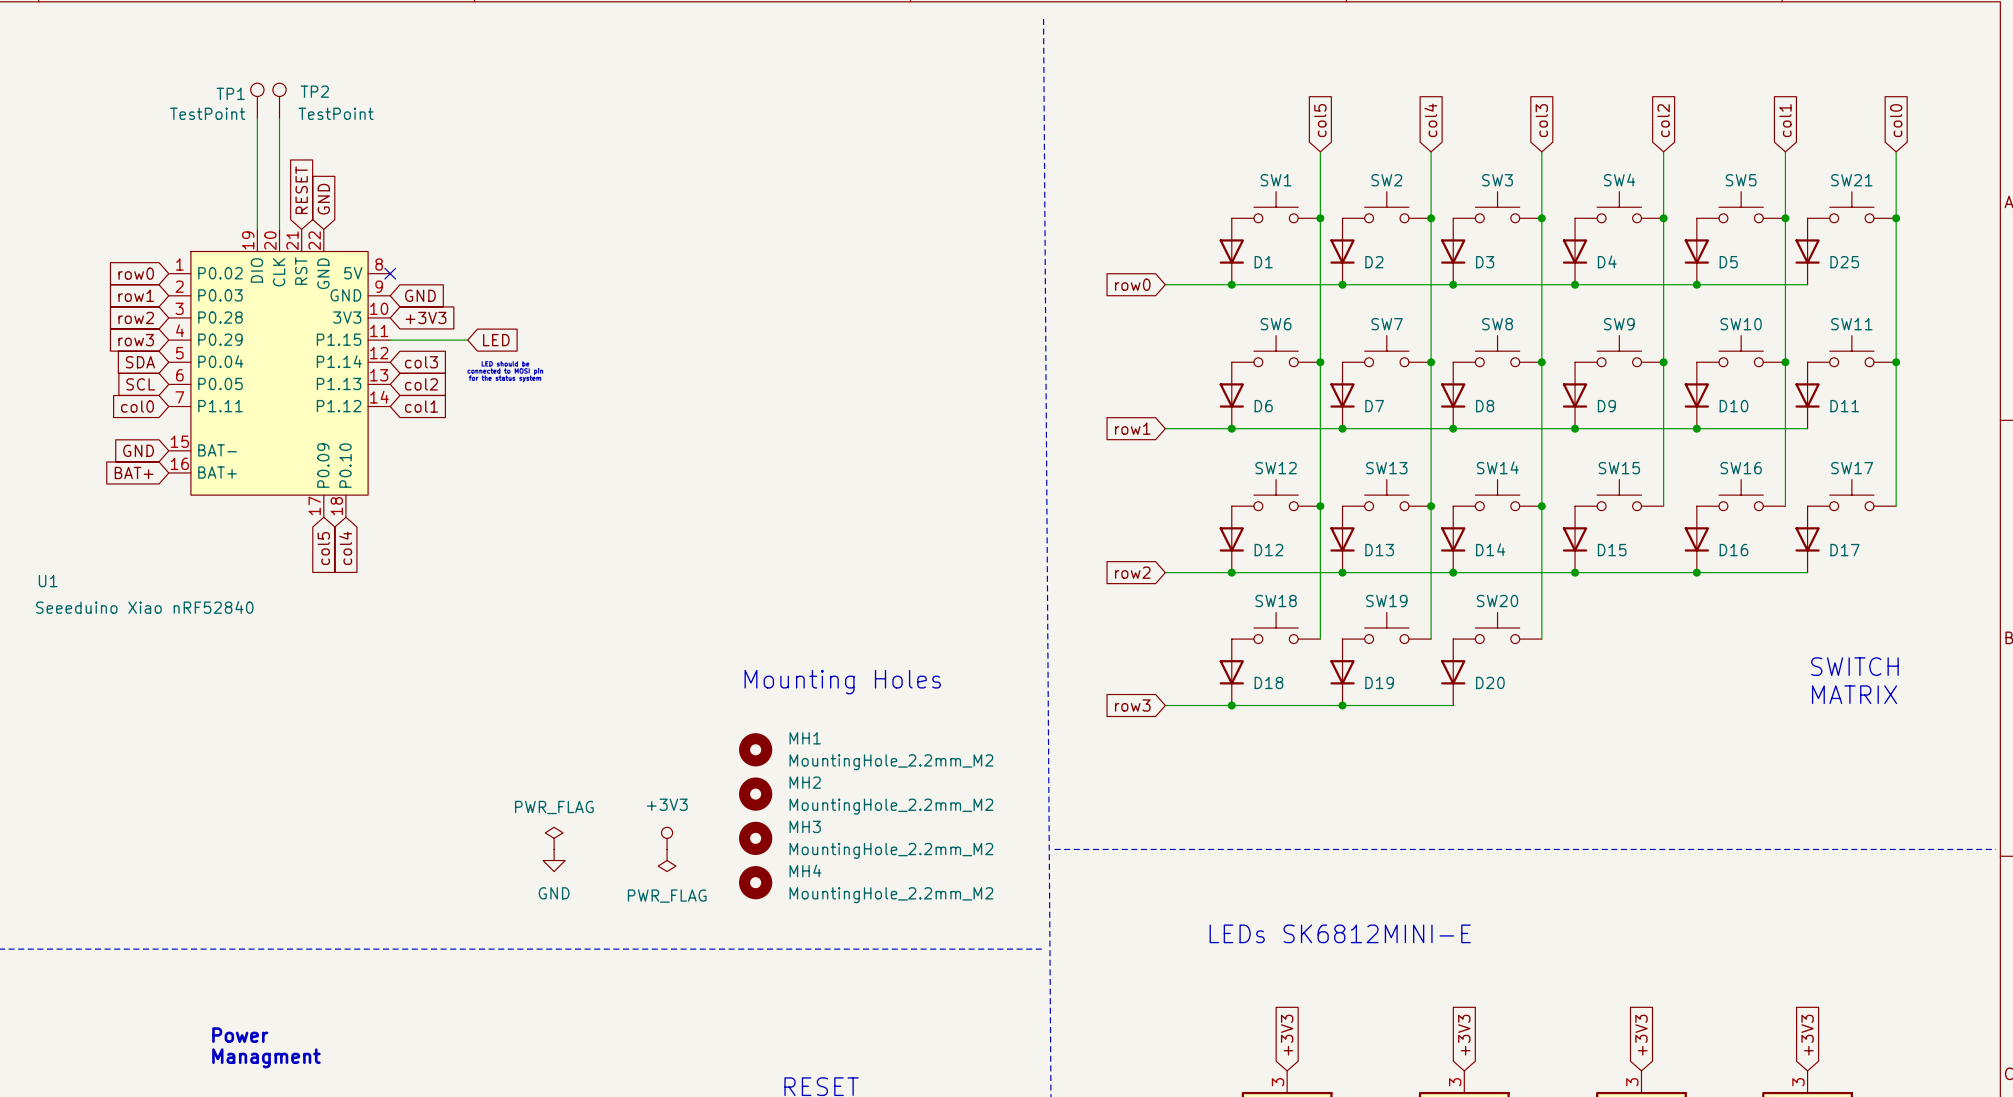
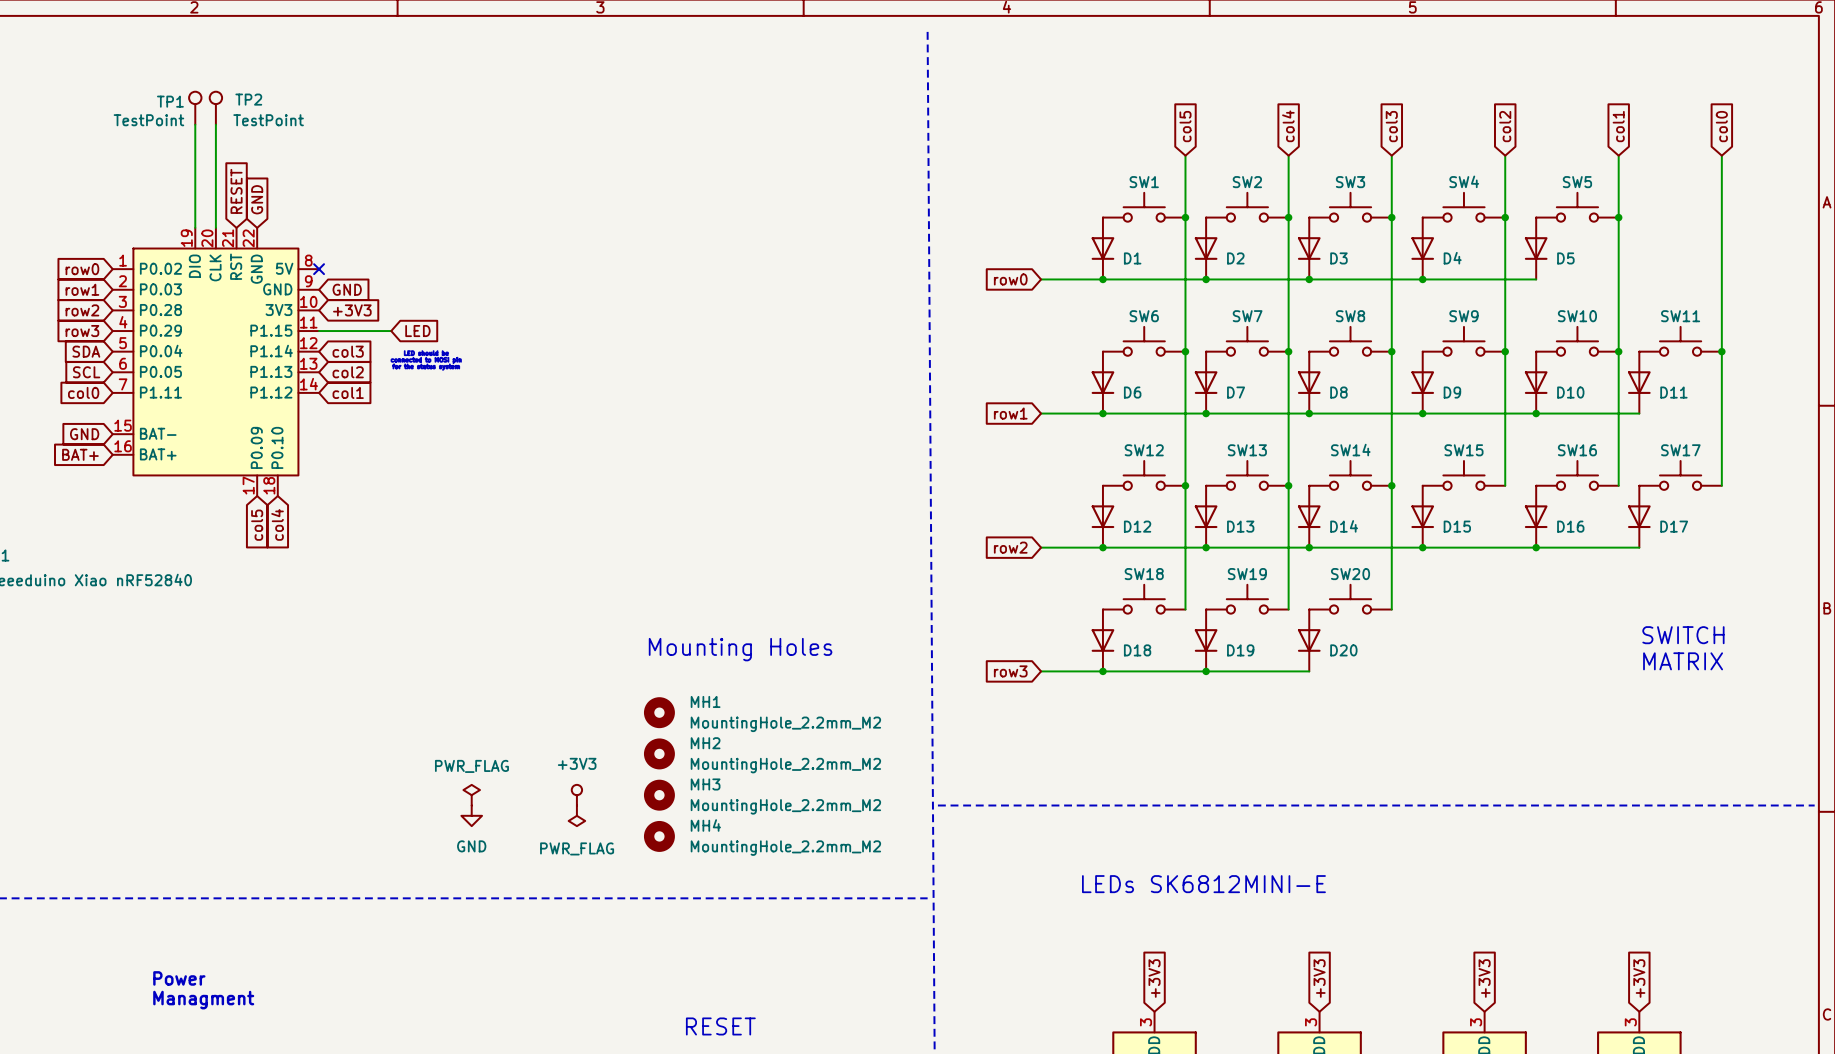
SW21: (1851, 207) -> none
junction: (1896, 218) -> none
D25: (1807, 251) -> none
wire: (1696, 284) (1807, 284) -> none
junction: (1696, 284) -> none

